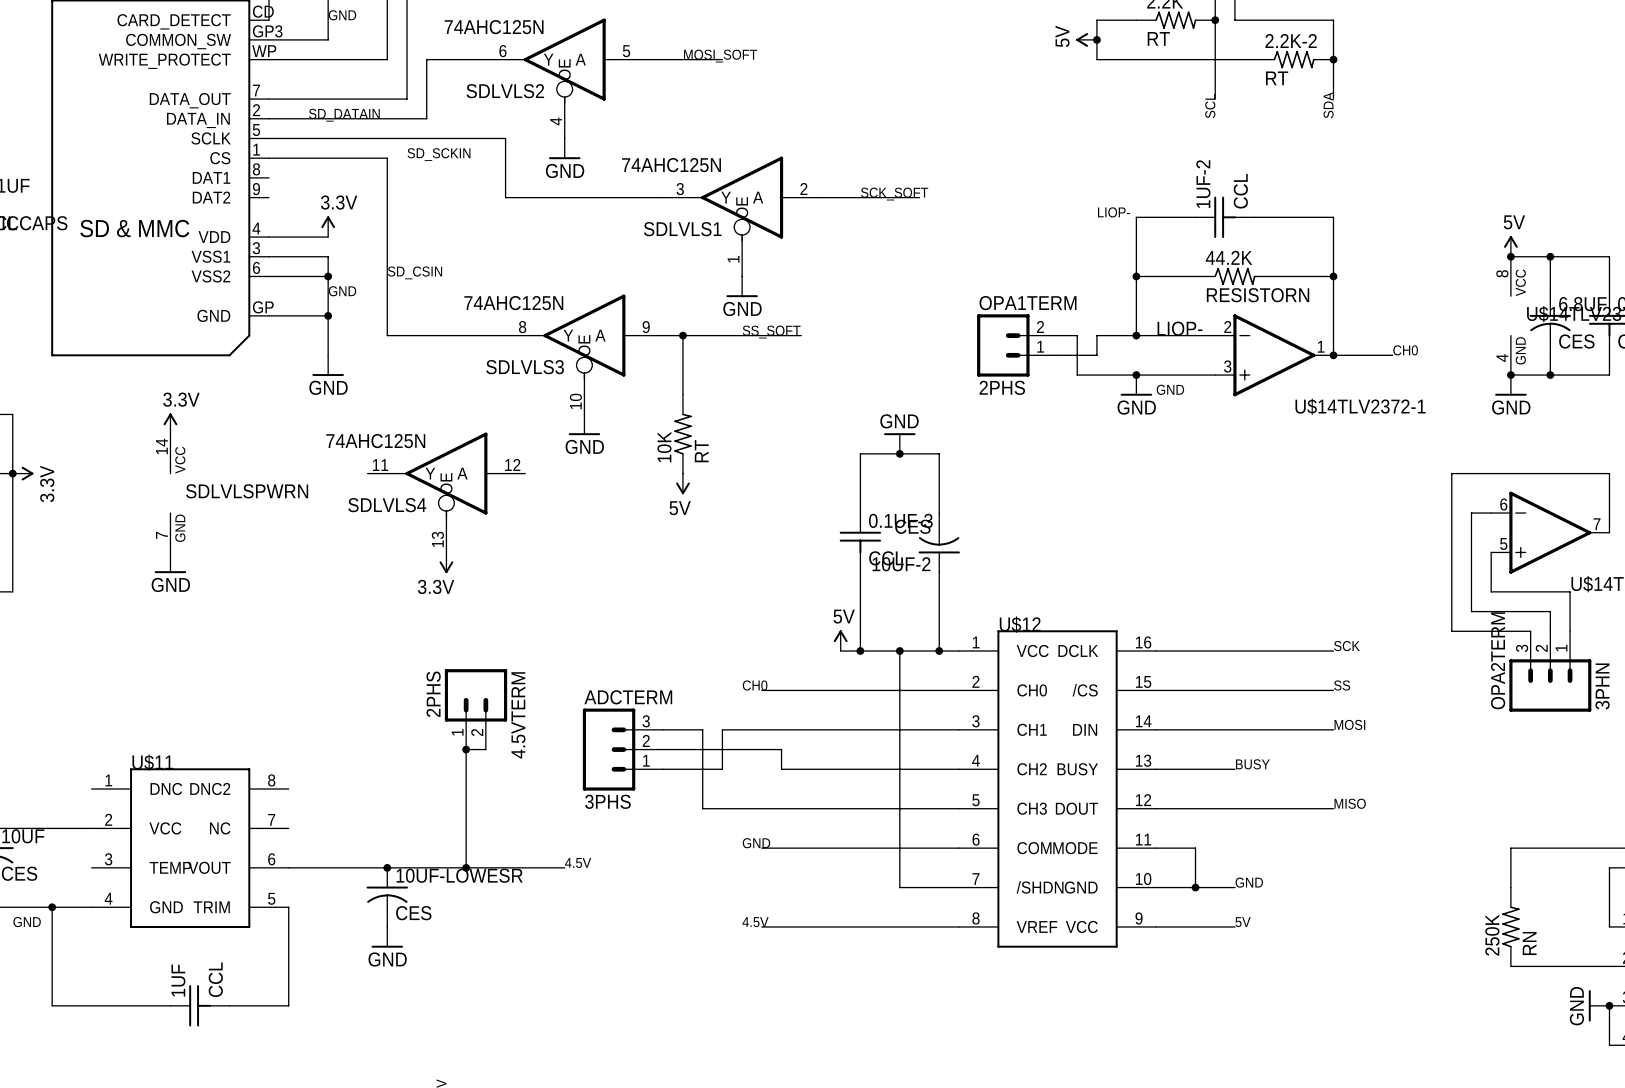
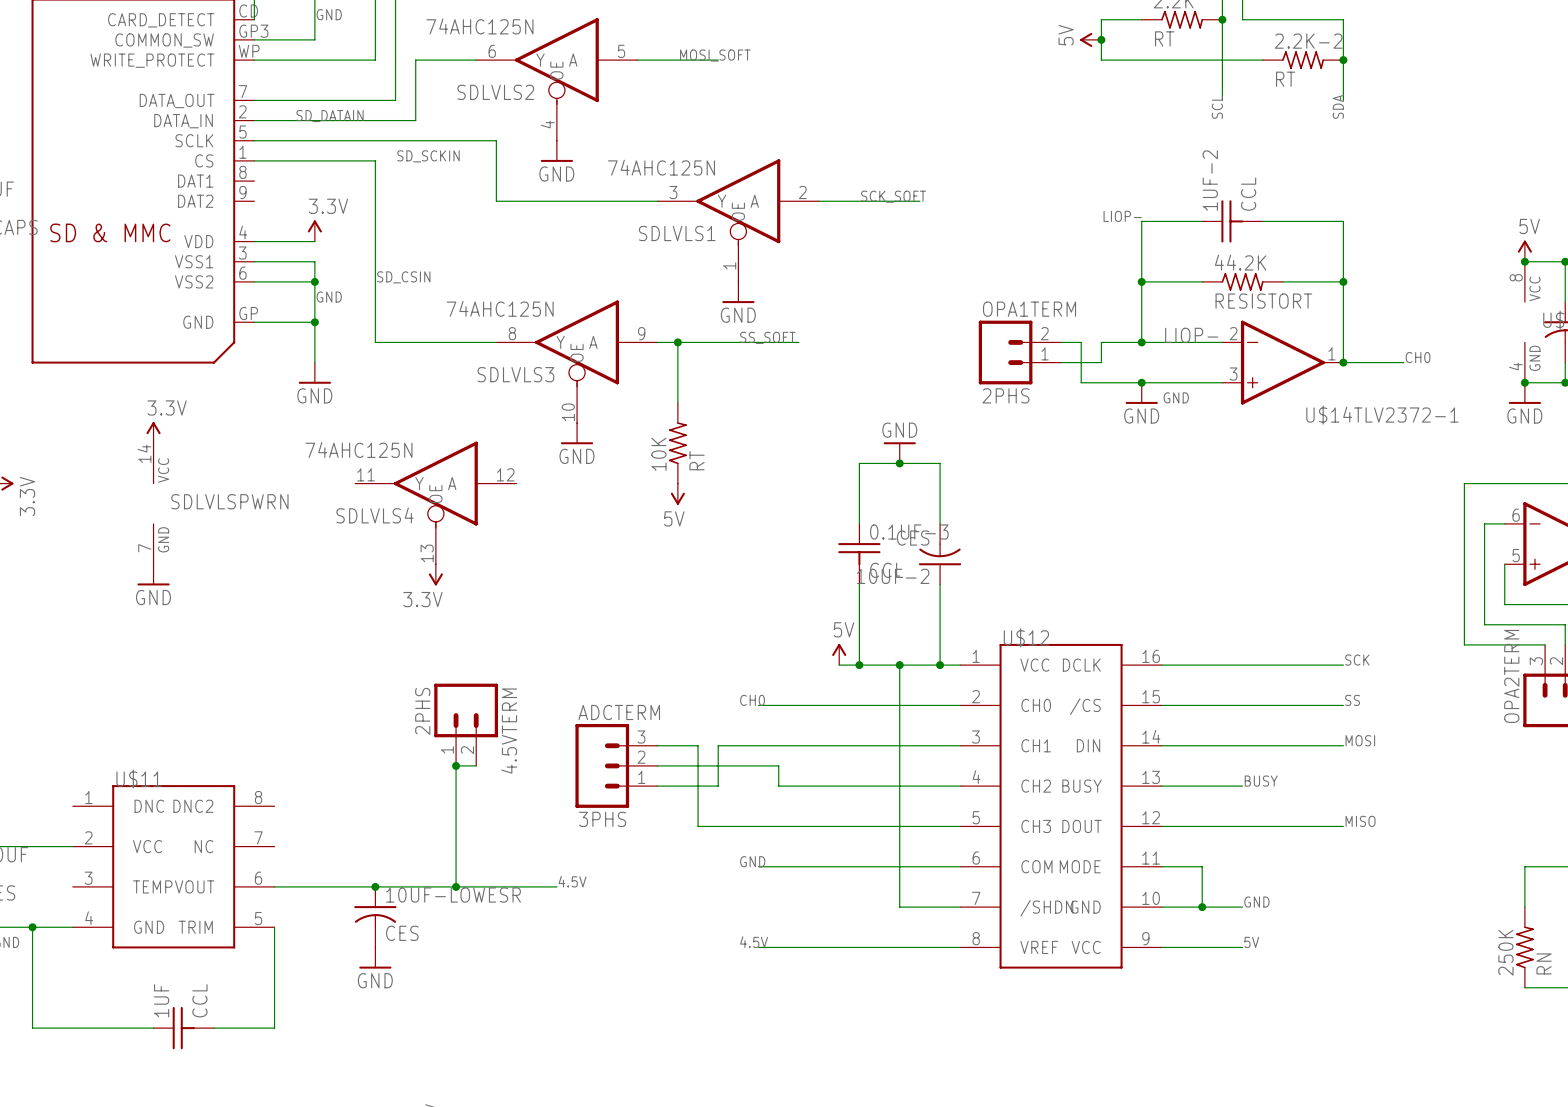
44.2K value: RESISTORN (1258, 295) -> RESISTORT (1263, 301)

